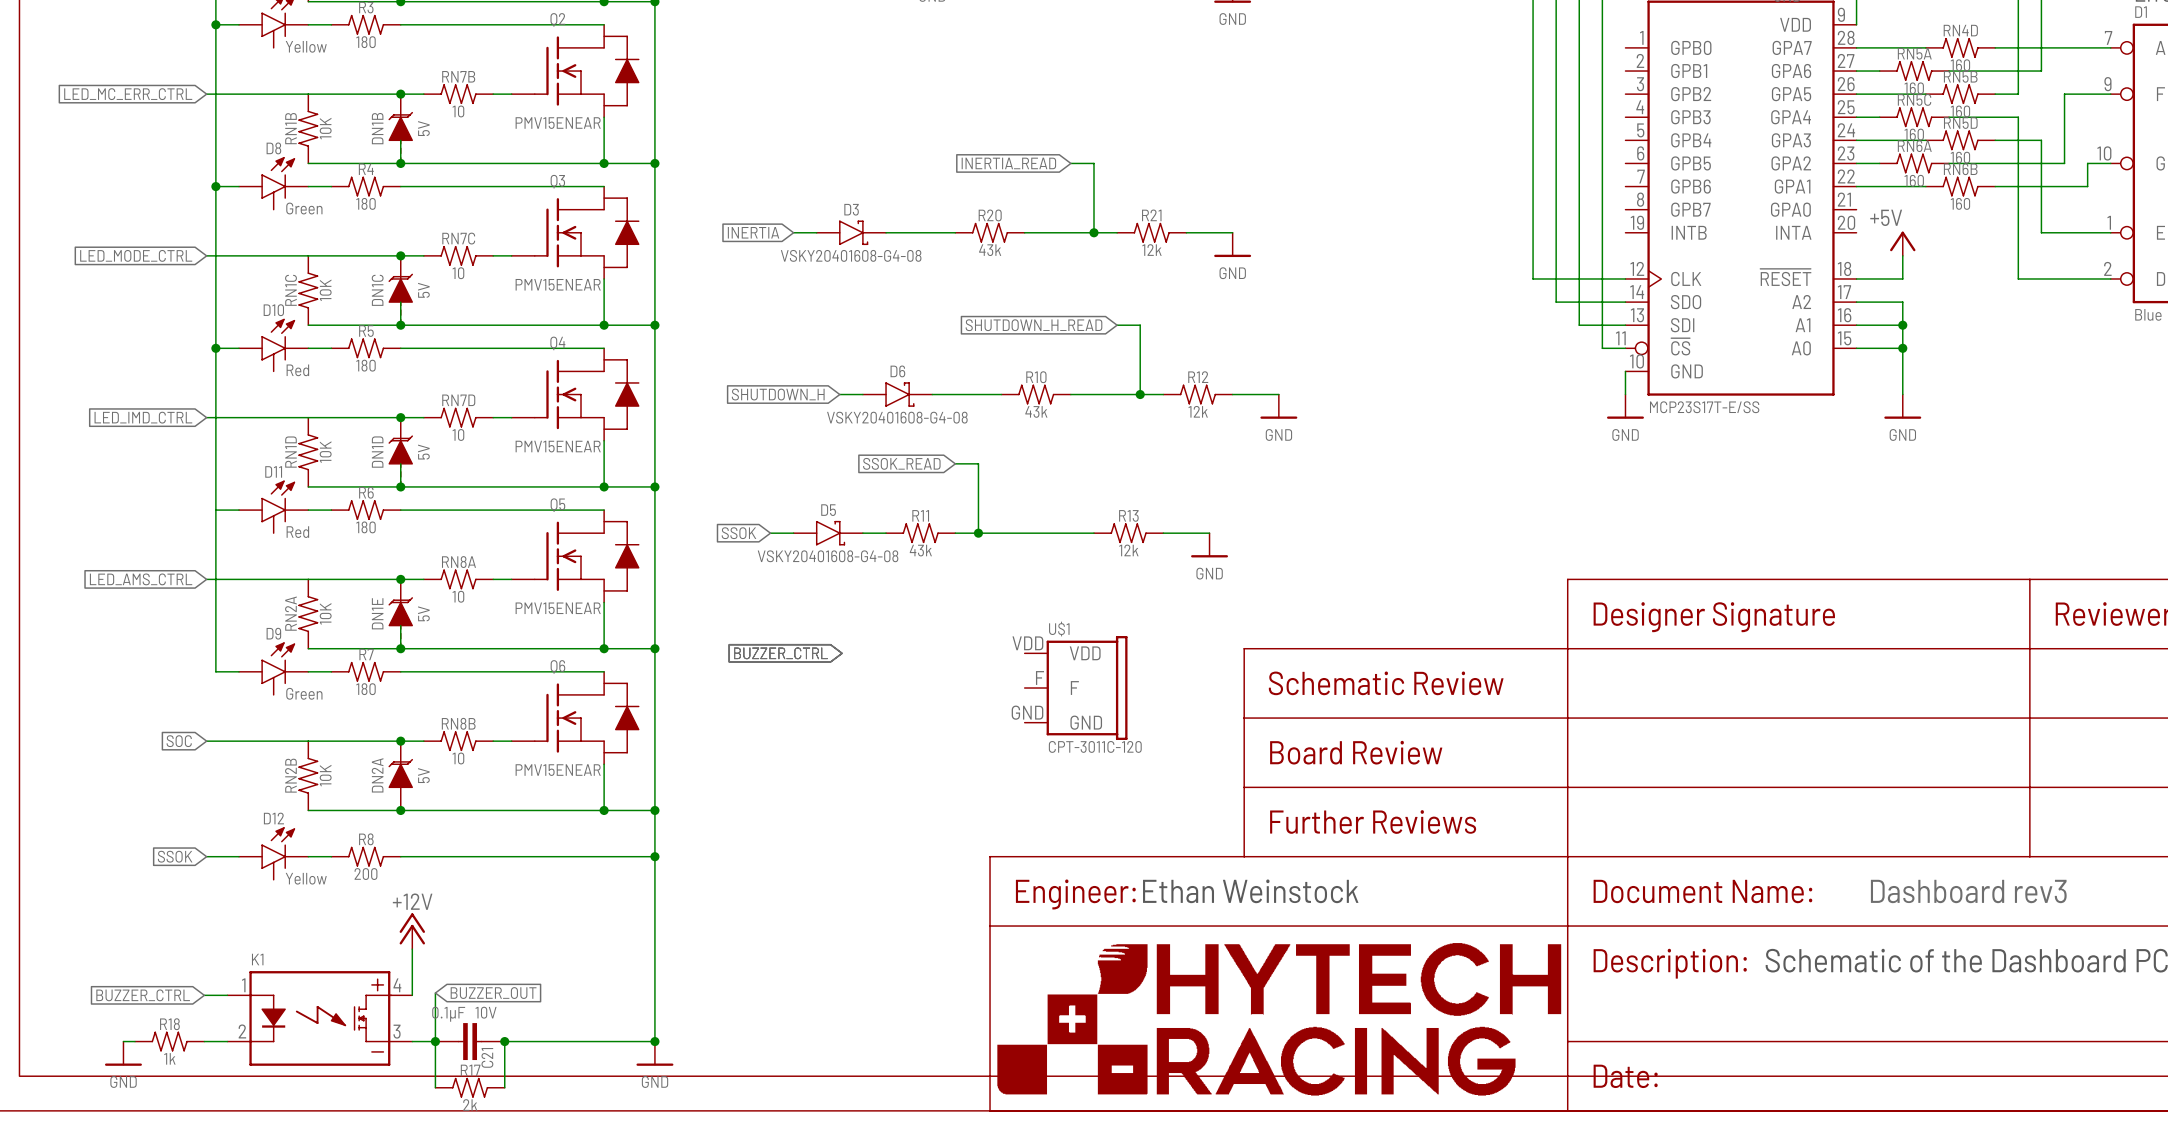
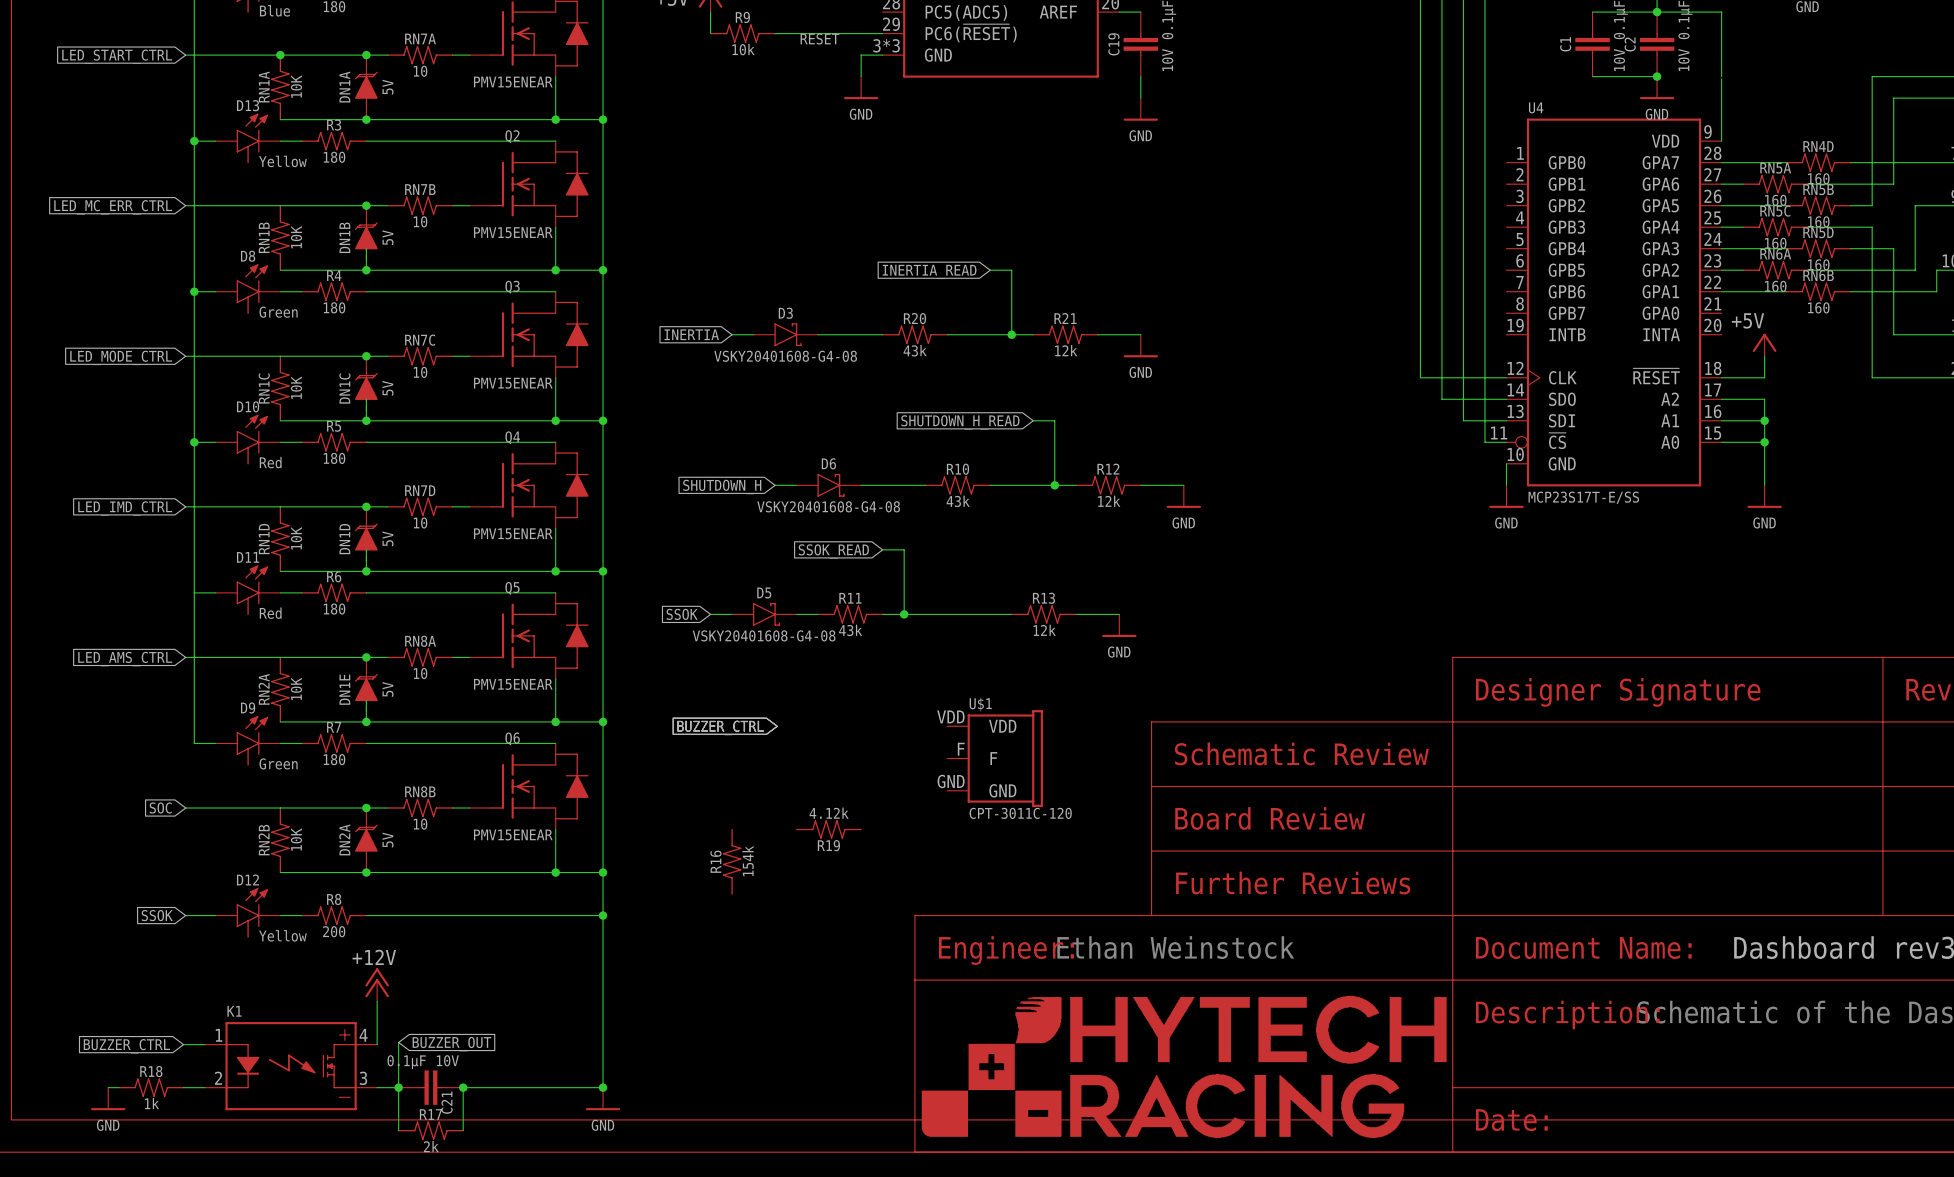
R19: none -> (828, 829)
R16: none -> (732, 861)

